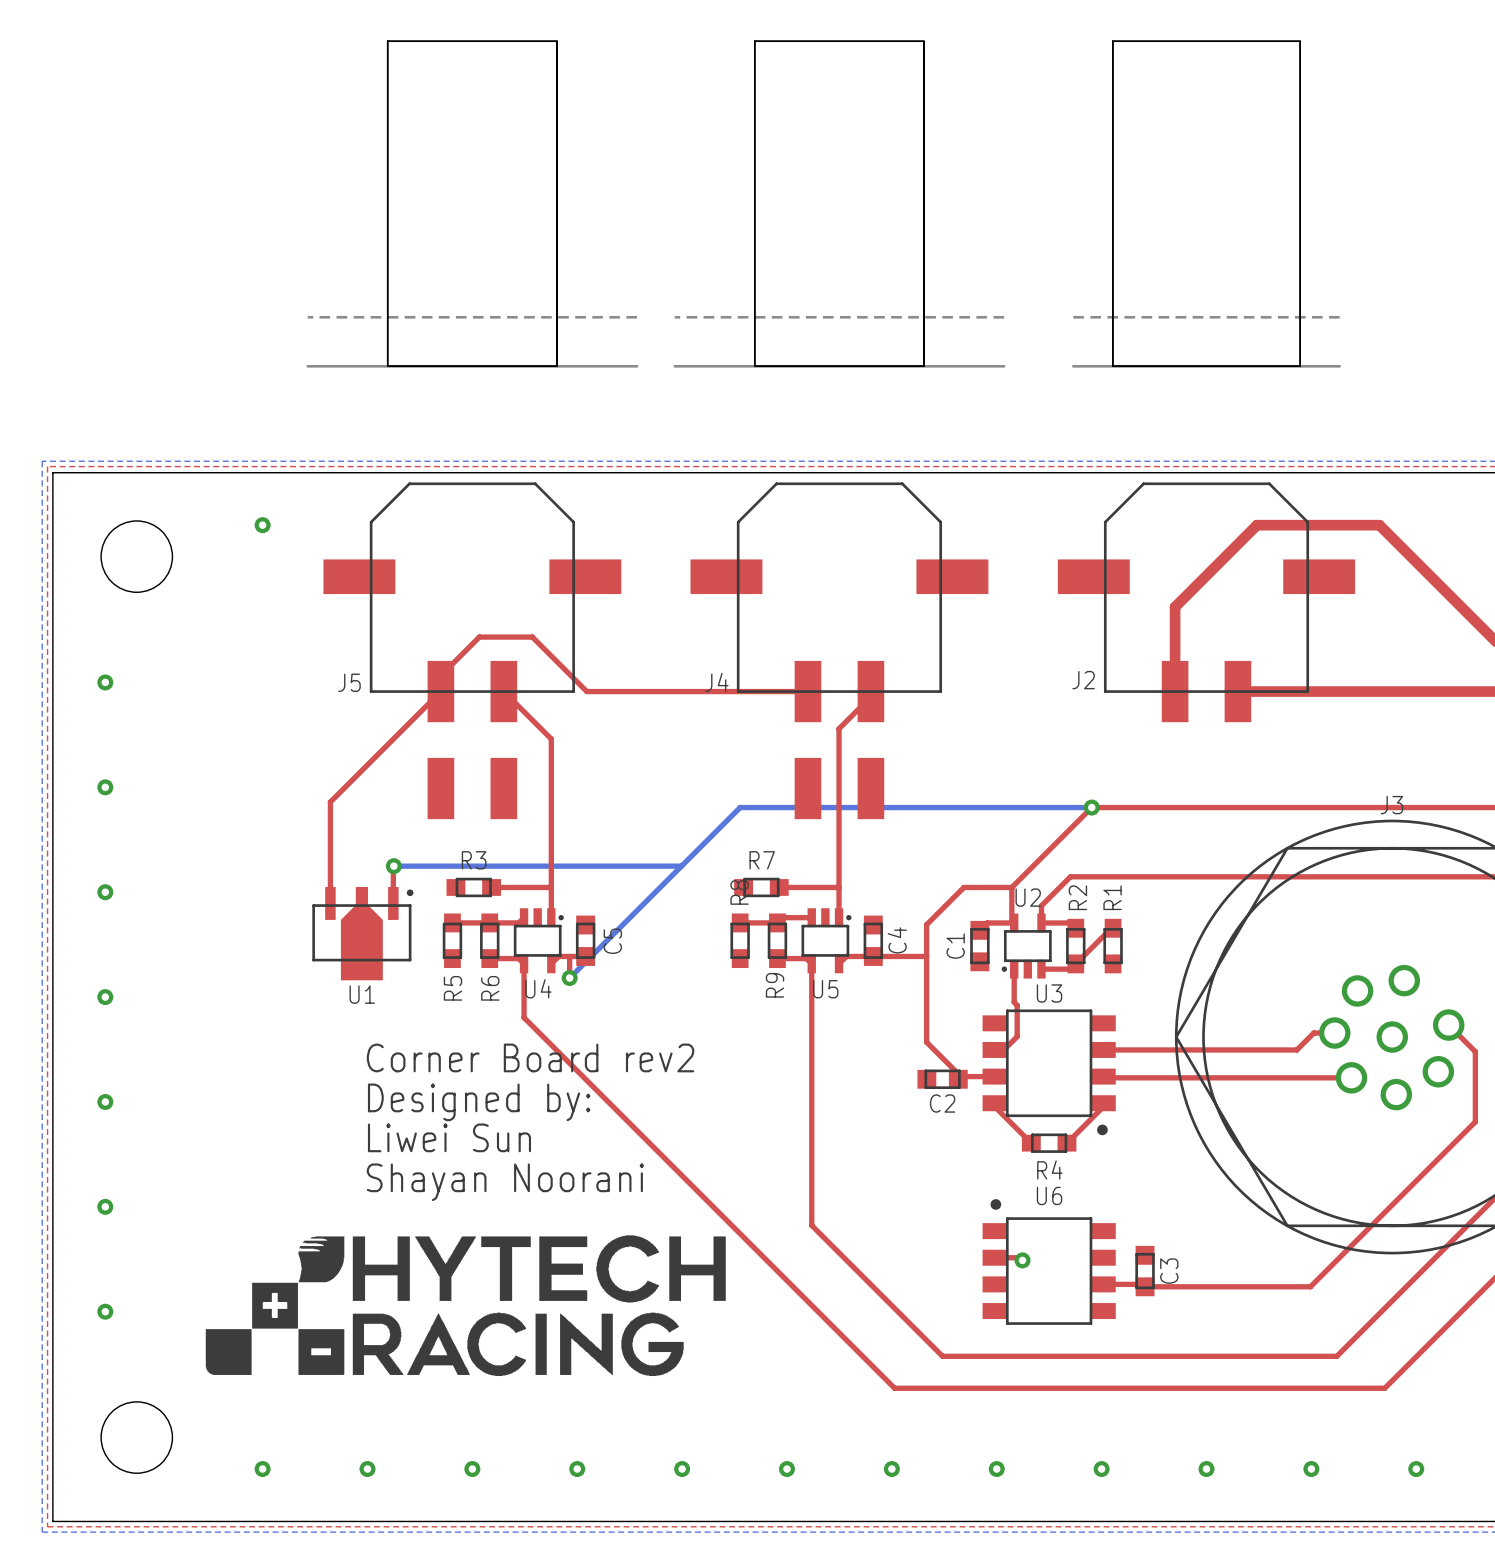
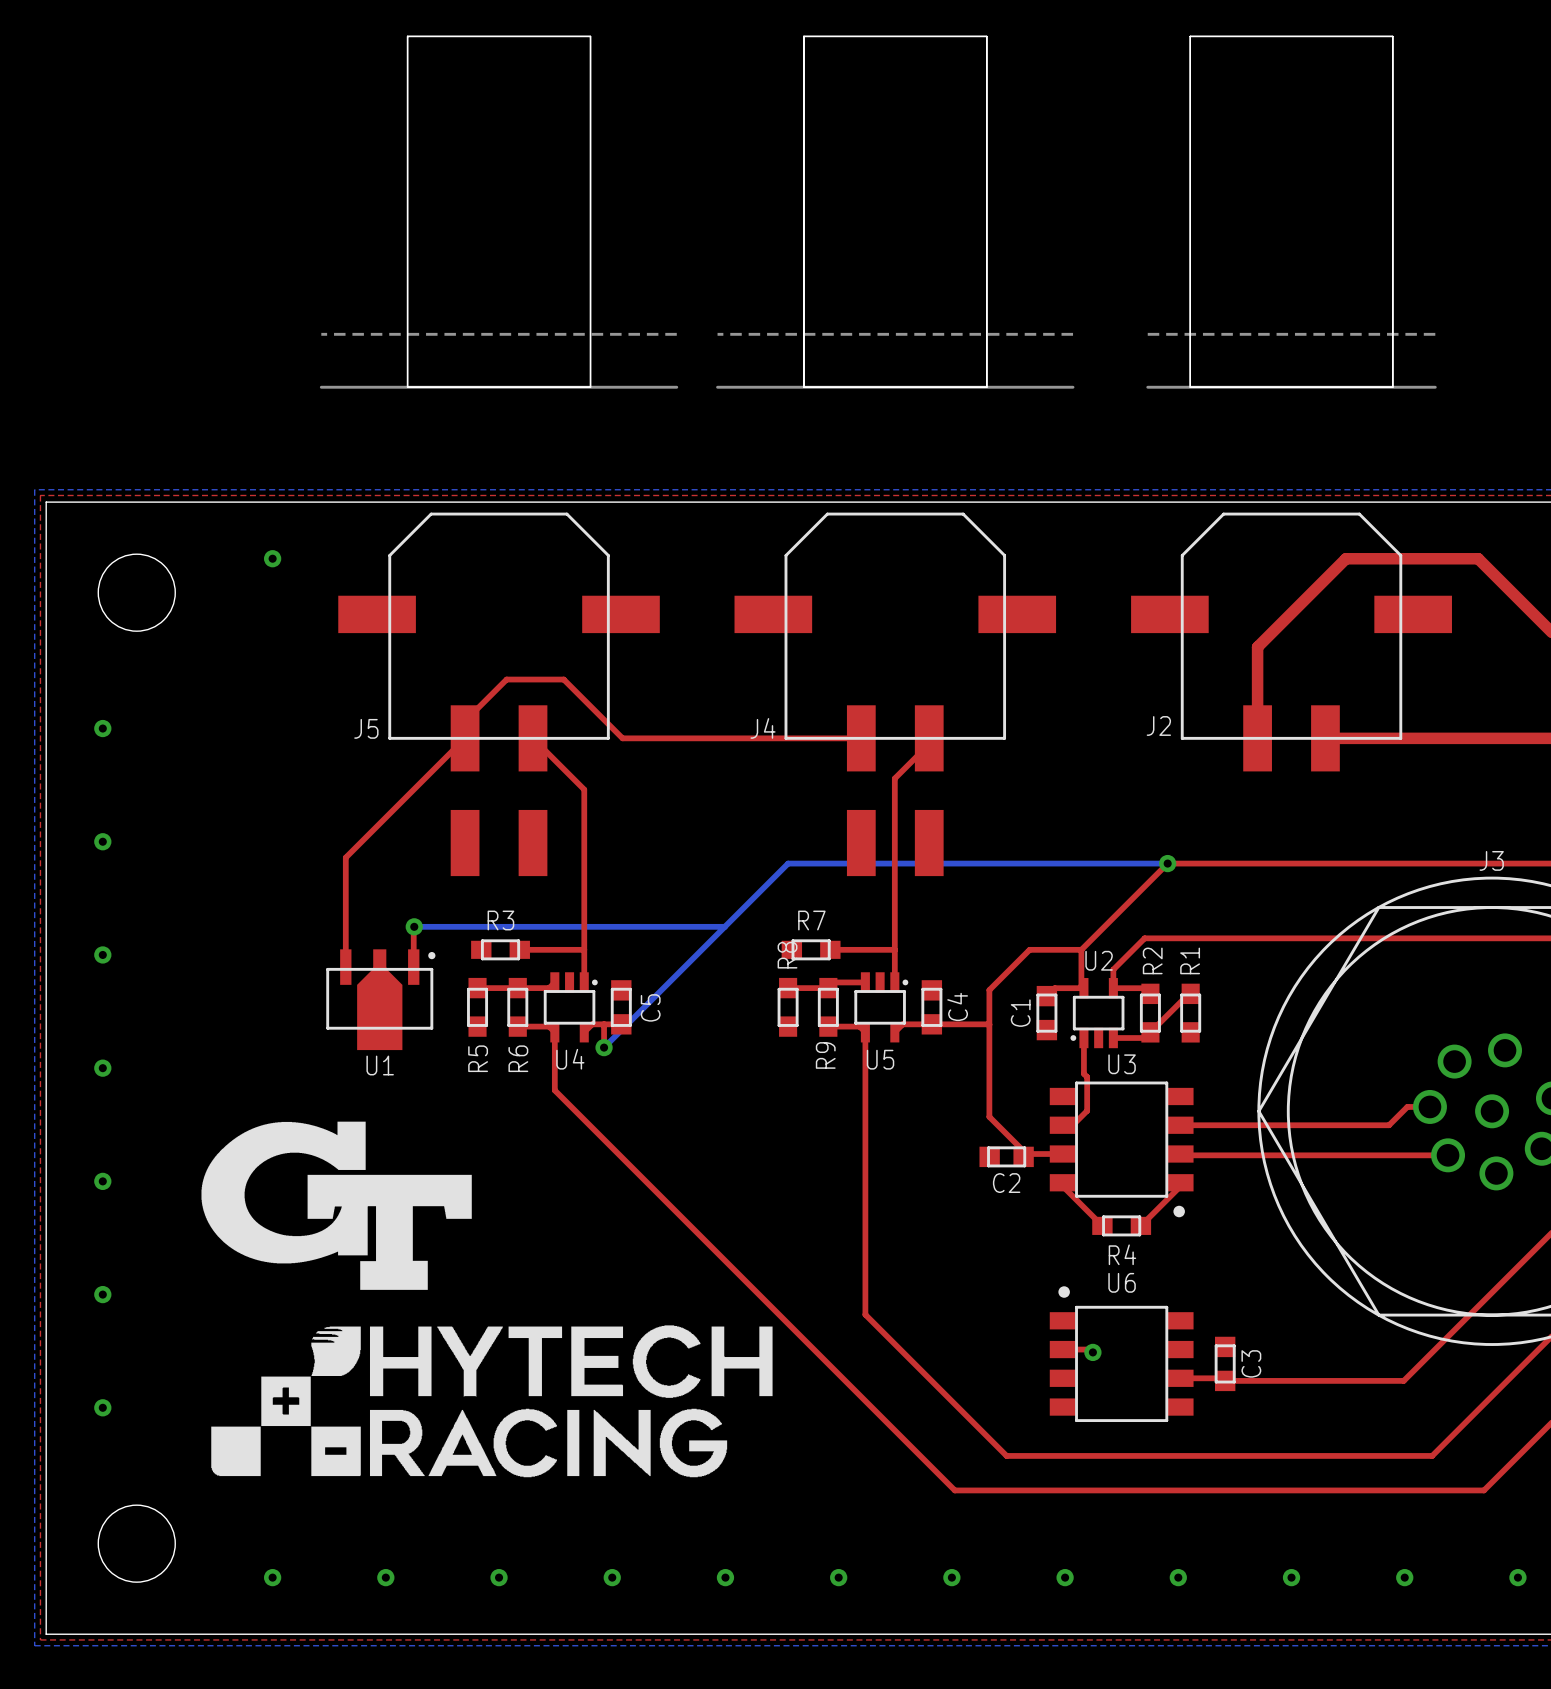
drawing: none -> [201, 1121, 472, 1290]
text: Corner Board rev2 (530, 1057) -> none
text: Designed by: (479, 1102) -> none
text: Liwei Sun (449, 1137) -> none
text: Shayan Noorani (505, 1182) -> none

